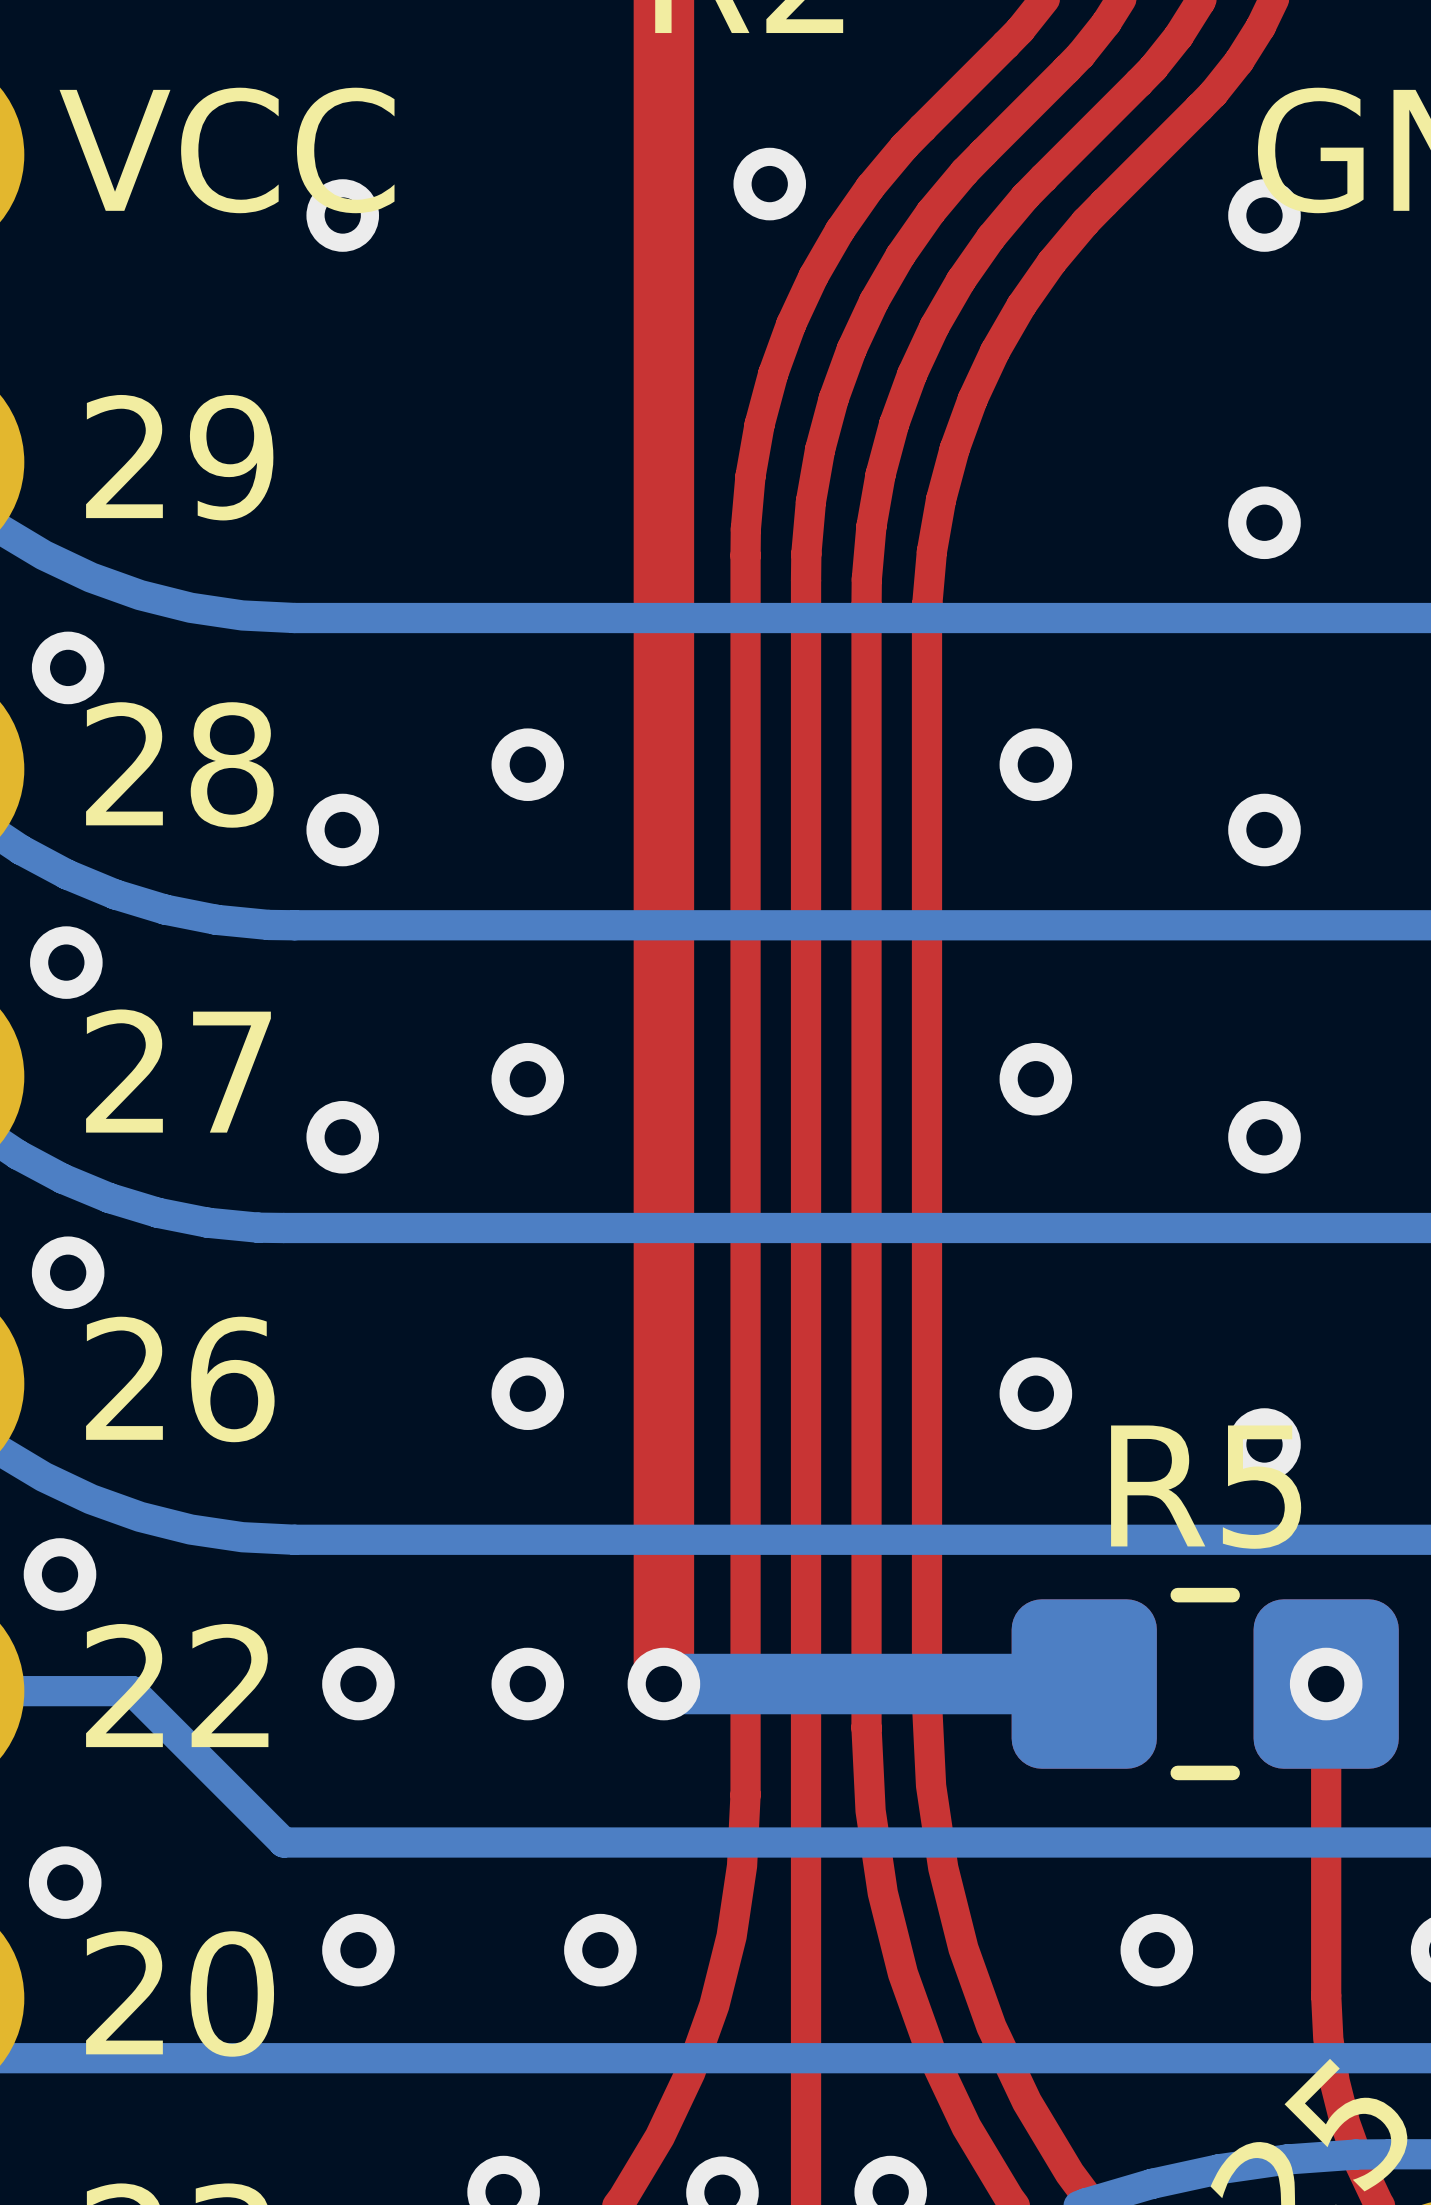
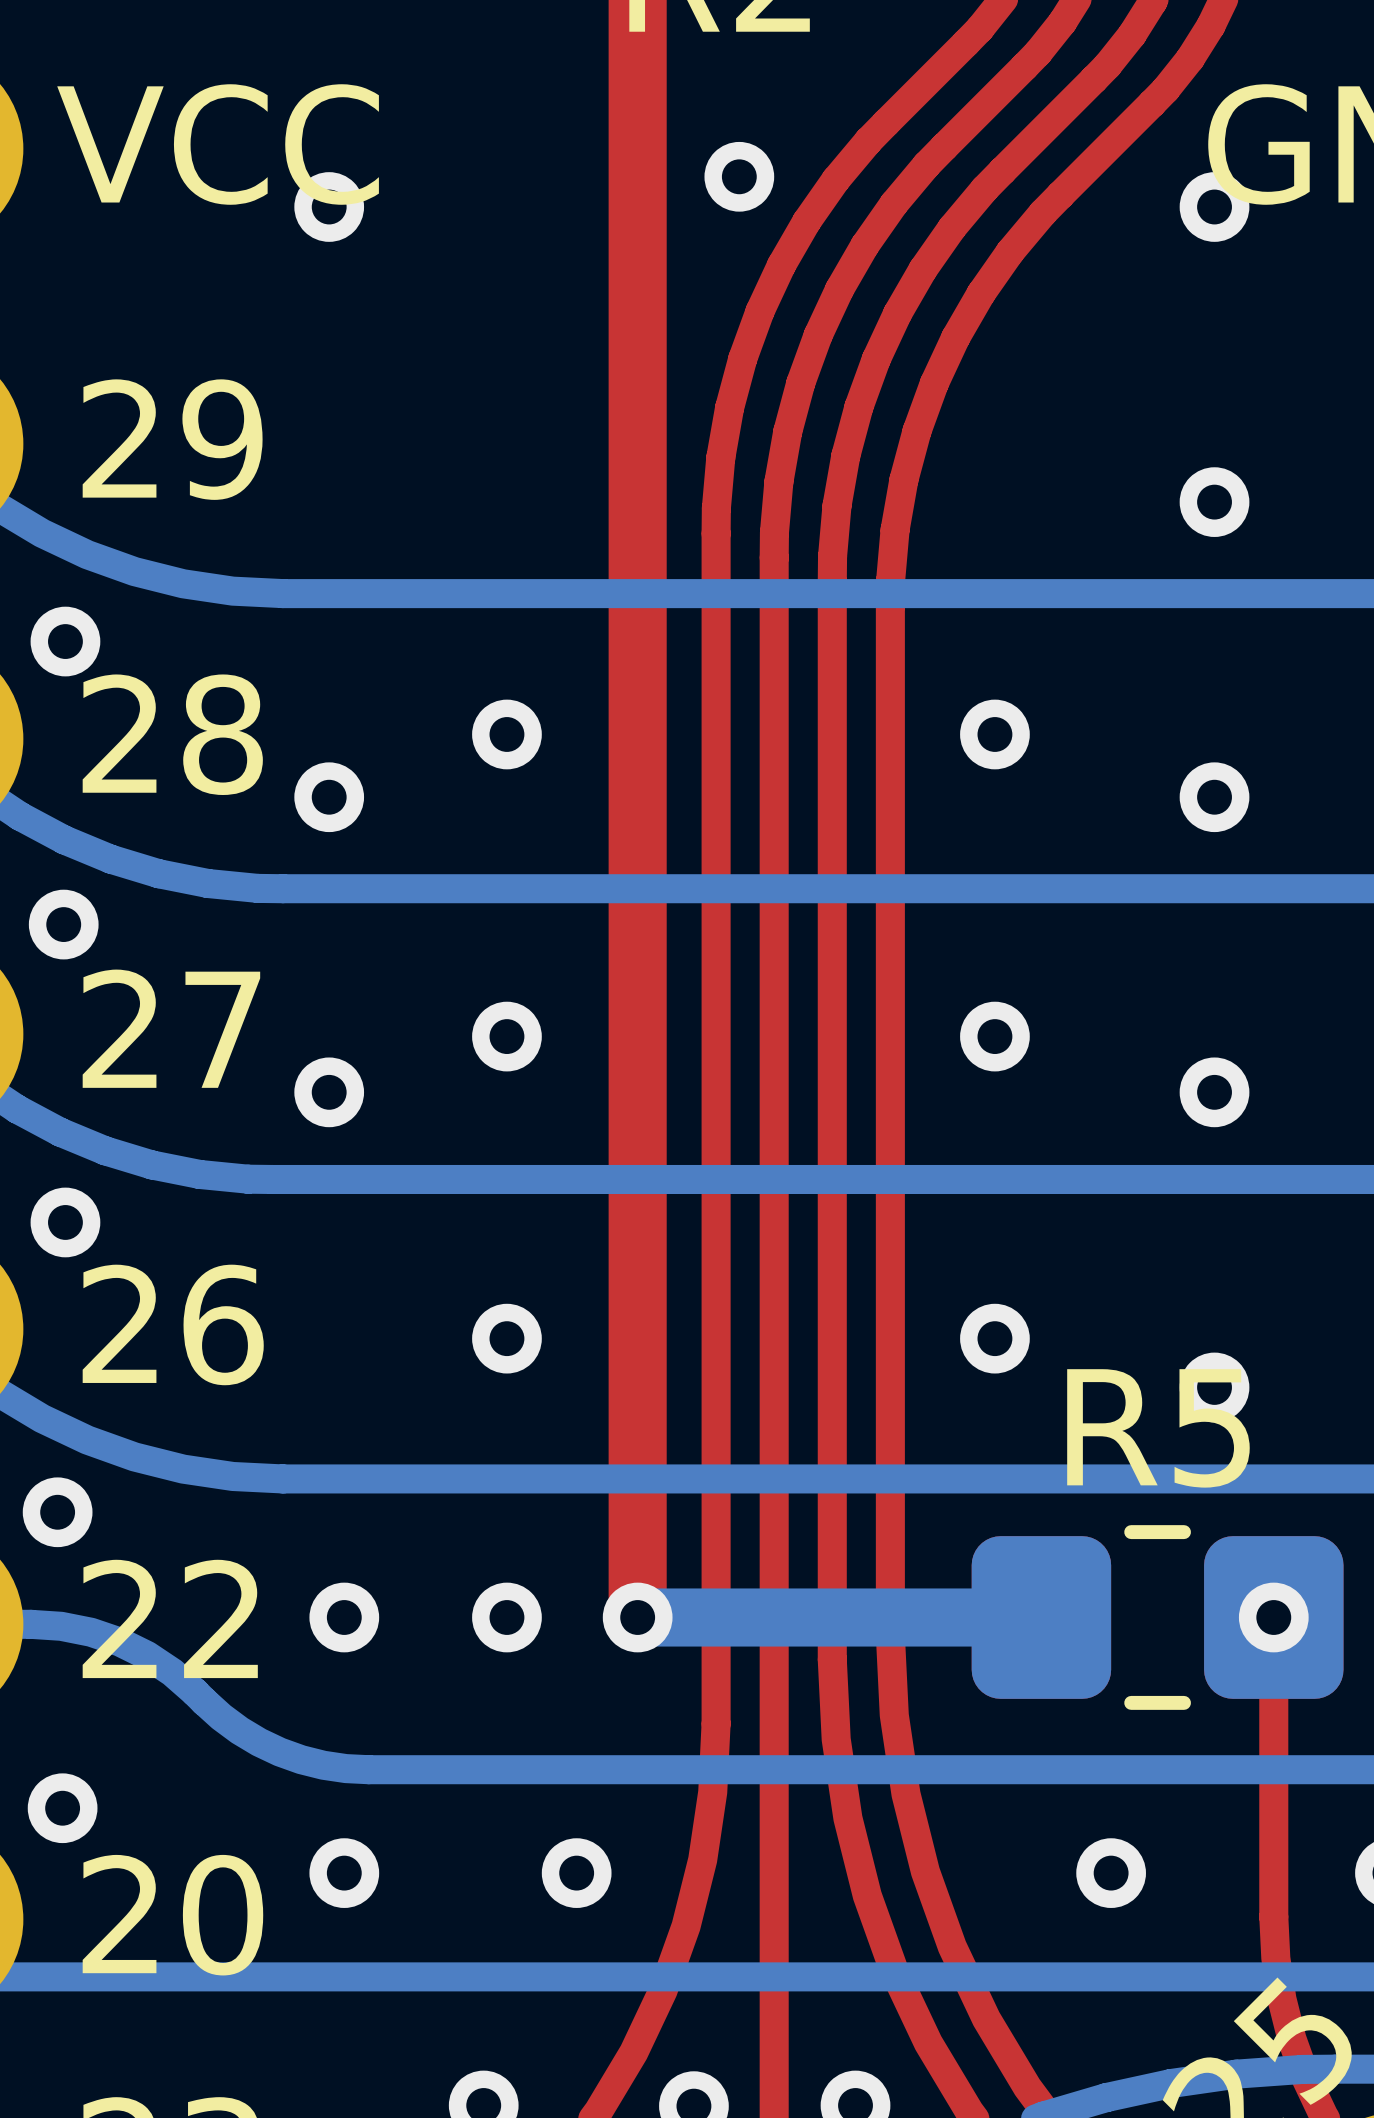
bottom track: (32, 1691) (132, 1691) (203, 1762) -> (30, 1624) (61, 1626) (91, 1632) (119, 1642) (147, 1655) (172, 1672) (195, 1692)
bottom track: (212, 1771) (283, 1842) (383, 1842) -> (204, 1701) (239, 1730) (279, 1752) (323, 1765) (368, 1769)

